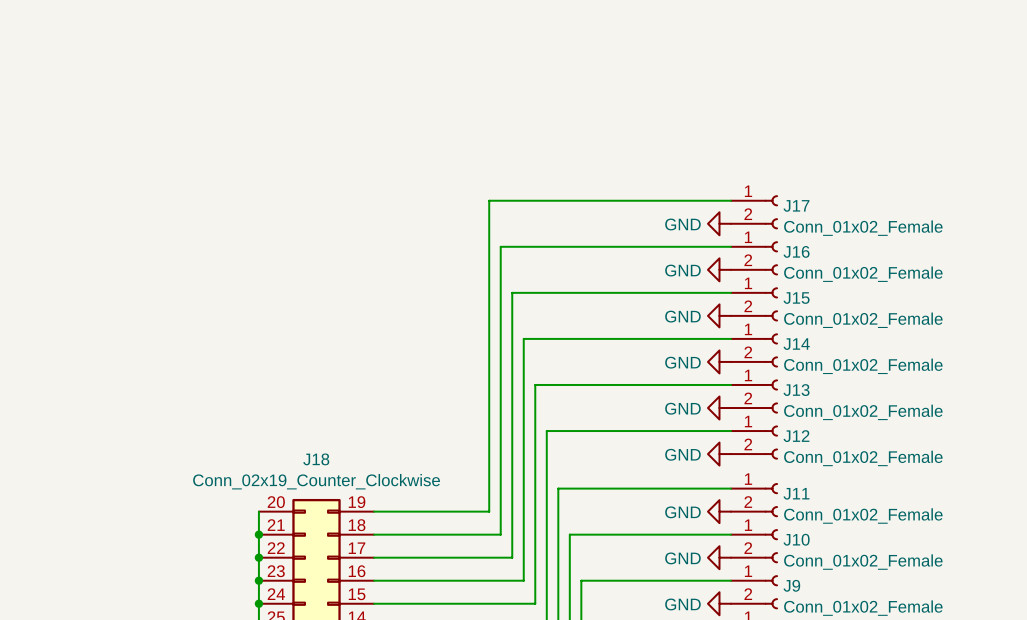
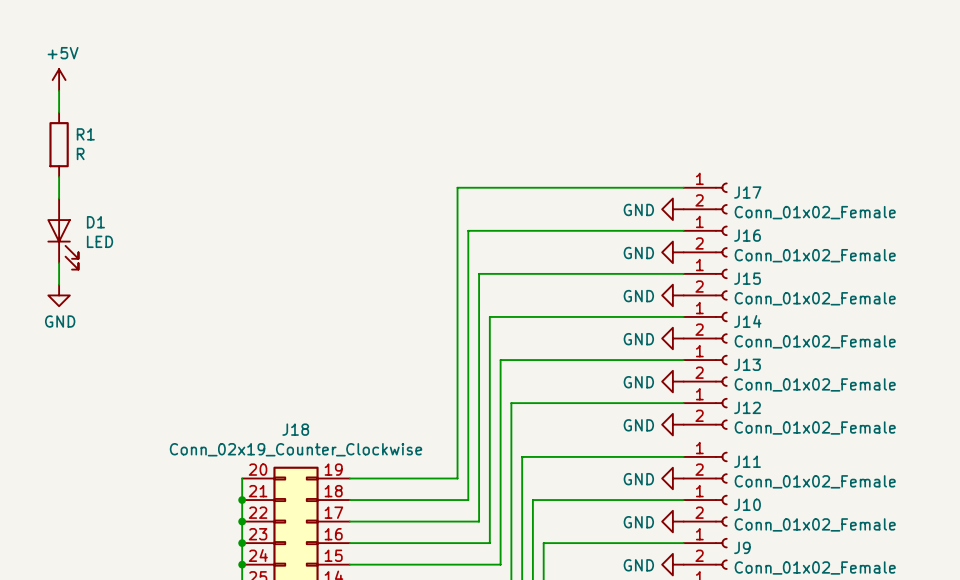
power symbol: none -> +5V (59, 80)
wire: none -> (59, 90) (59, 112)
R1: none -> R (59, 144)
wire: none -> (59, 176) (59, 198)
D1: none -> LED (62, 234)
wire: none -> (59, 263) (59, 284)
power symbol: none -> GND (59, 295)

